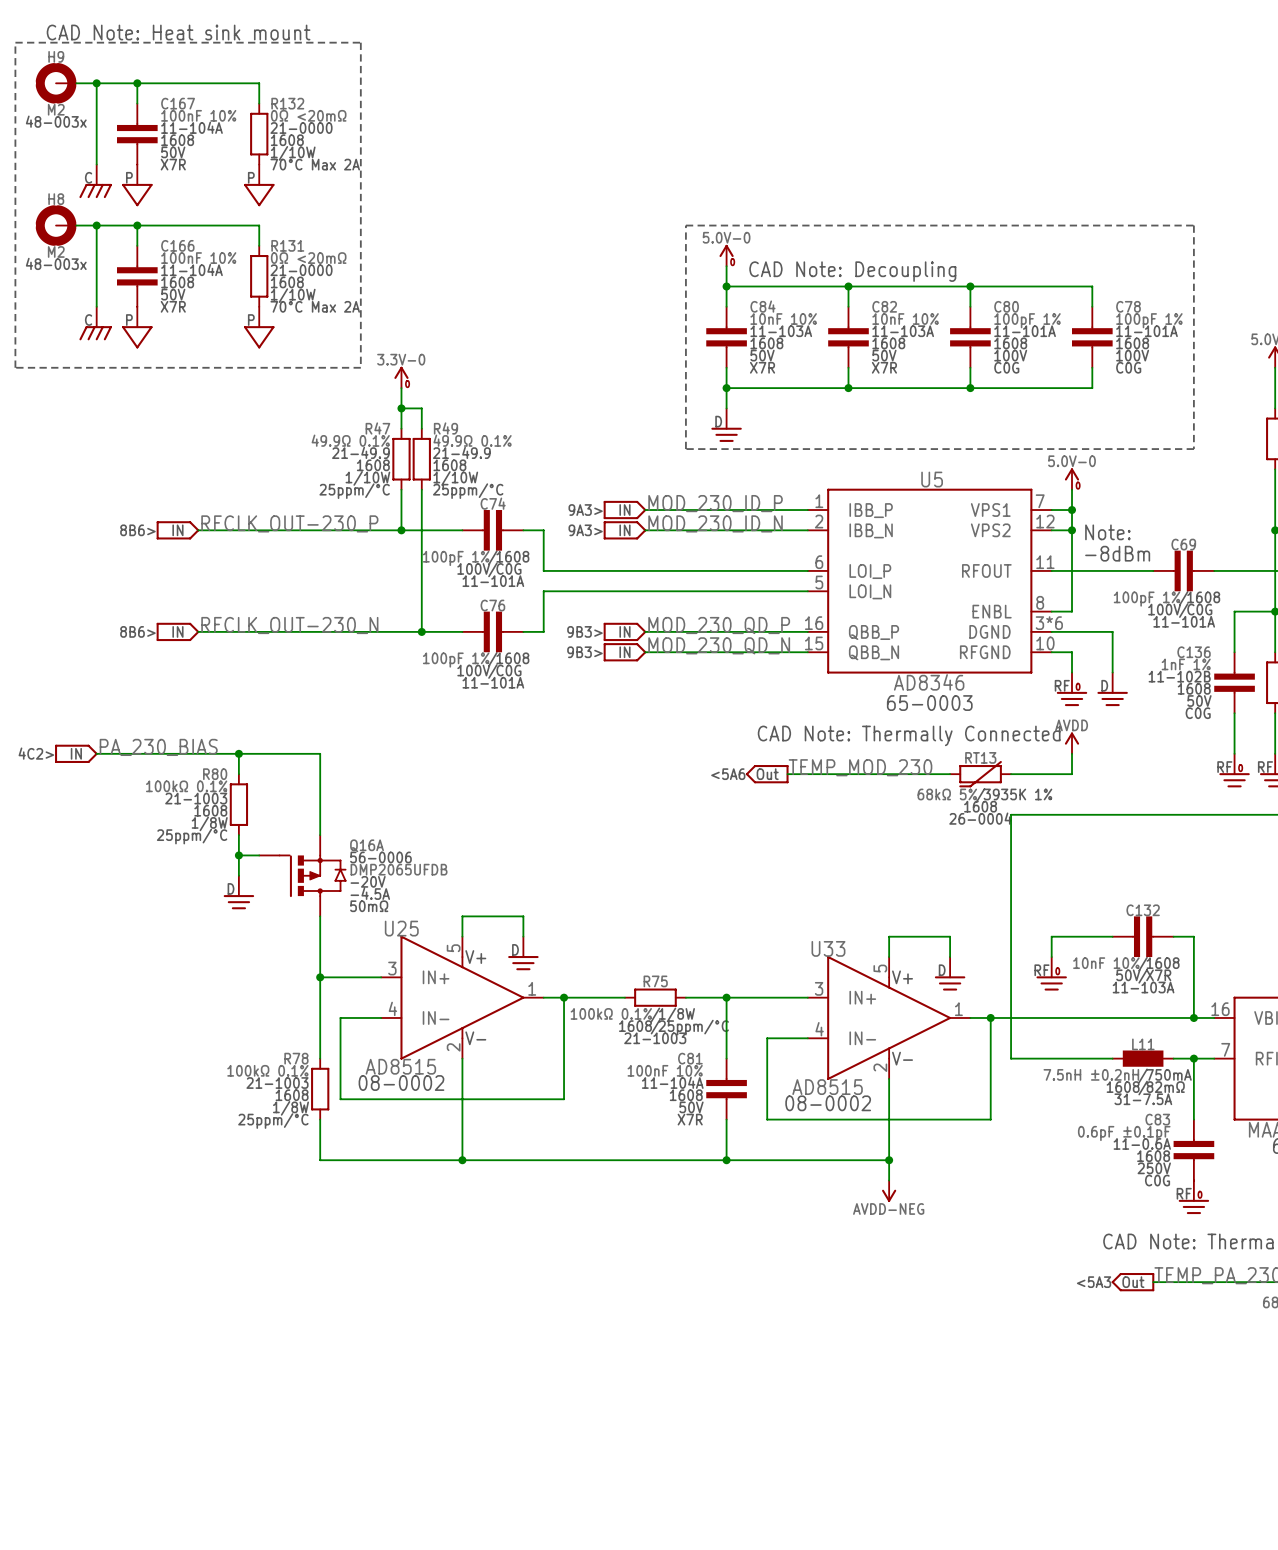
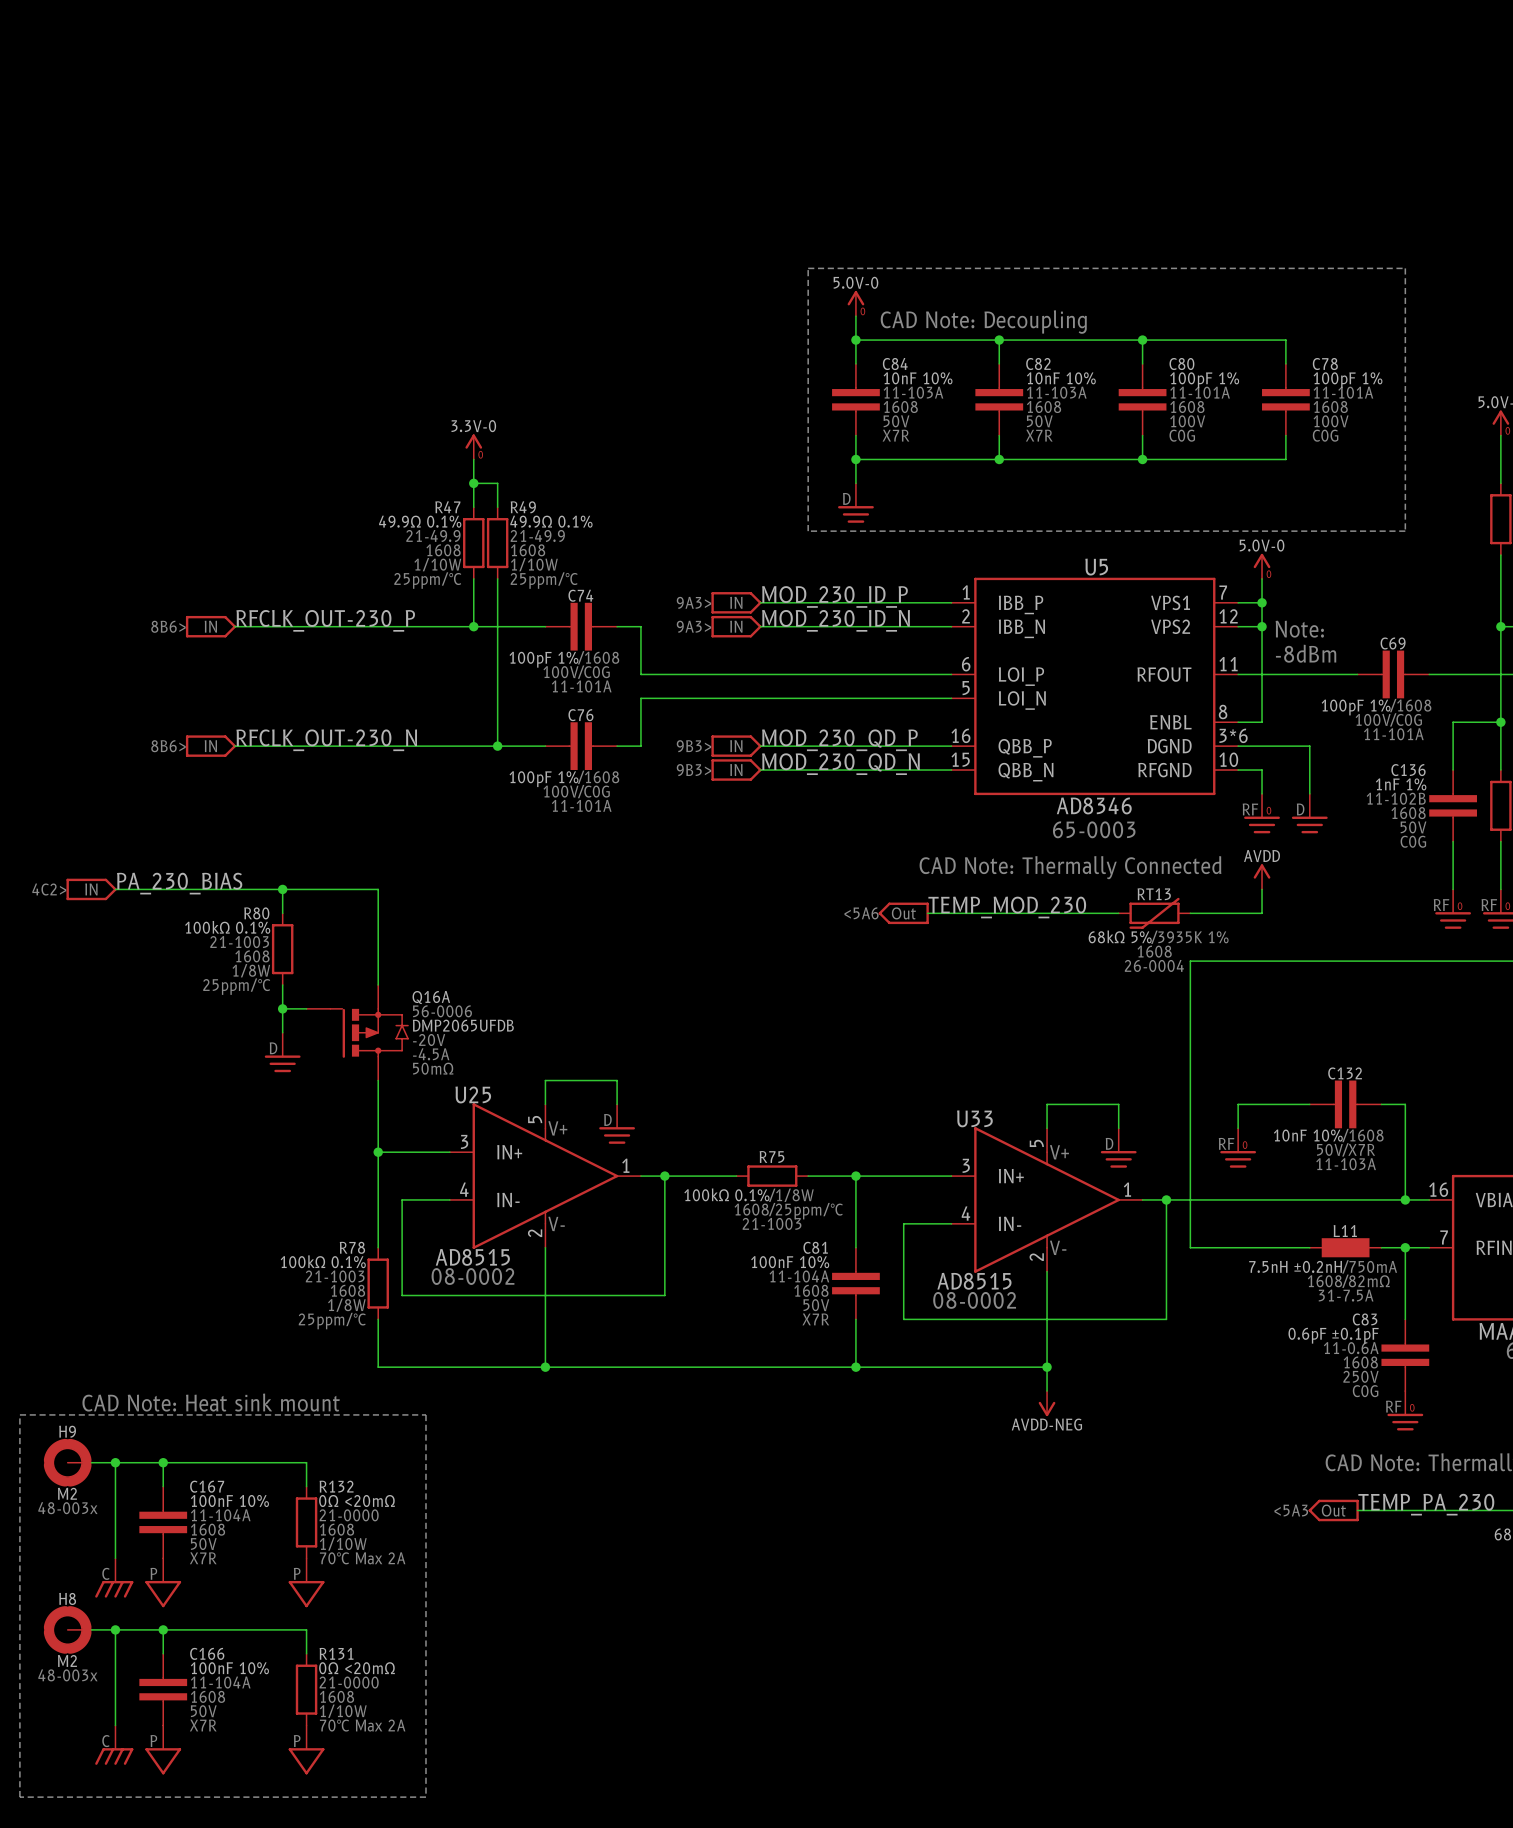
text: CAD Note: Heat sink mount (178, 32) -> none
line: (15, 42) (360, 42) (360, 367) (15, 367) (15, 42) -> none
H9 position: (56, 83) -> (67, 1462)
wire: (76, 83) (259, 83) (259, 103) -> none
wire: (96, 83) (96, 164) -> none
junction: (96, 83) -> none
wire: (137, 83) (137, 103) -> none
junction: (137, 83) -> none
C167 position: (137, 134) -> (163, 1522)
R132 position: (259, 134) -> (306, 1522)
power symbol: (95, 181) -> none
power symbol: (137, 185) -> none
power symbol: (259, 185) -> none
H8 position: (56, 225) -> (67, 1629)
wire: (76, 225) (259, 225) (259, 245) -> none
wire: (96, 225) (96, 306) -> none
junction: (96, 225) -> none
wire: (137, 225) (137, 245) -> none
junction: (137, 225) -> none
C166 position: (137, 276) -> (163, 1689)
R131 position: (259, 276) -> (306, 1689)
power symbol: (95, 323) -> none
power symbol: (137, 327) -> none
power symbol: (259, 327) -> none
text: none -> CAD Note: Heat sink mount (211, 1402)
line: none -> (19, 1414) (425, 1414) (425, 1797) (19, 1797) (19, 1414)
wire: none -> (91, 1462) (306, 1462) (306, 1486)
wire: none -> (115, 1462) (115, 1558)
junction: none -> (115, 1462)
wire: none -> (163, 1462) (163, 1486)
junction: none -> (163, 1462)
power symbol: none -> (114, 1577)
power symbol: none -> (163, 1582)
power symbol: none -> (306, 1582)
wire: none -> (91, 1629) (306, 1629) (306, 1653)
wire: none -> (115, 1629) (115, 1725)
junction: none -> (115, 1629)
wire: none -> (163, 1629) (163, 1653)
junction: none -> (163, 1629)
power symbol: none -> (114, 1745)
power symbol: none -> (163, 1749)
power symbol: none -> (306, 1749)

